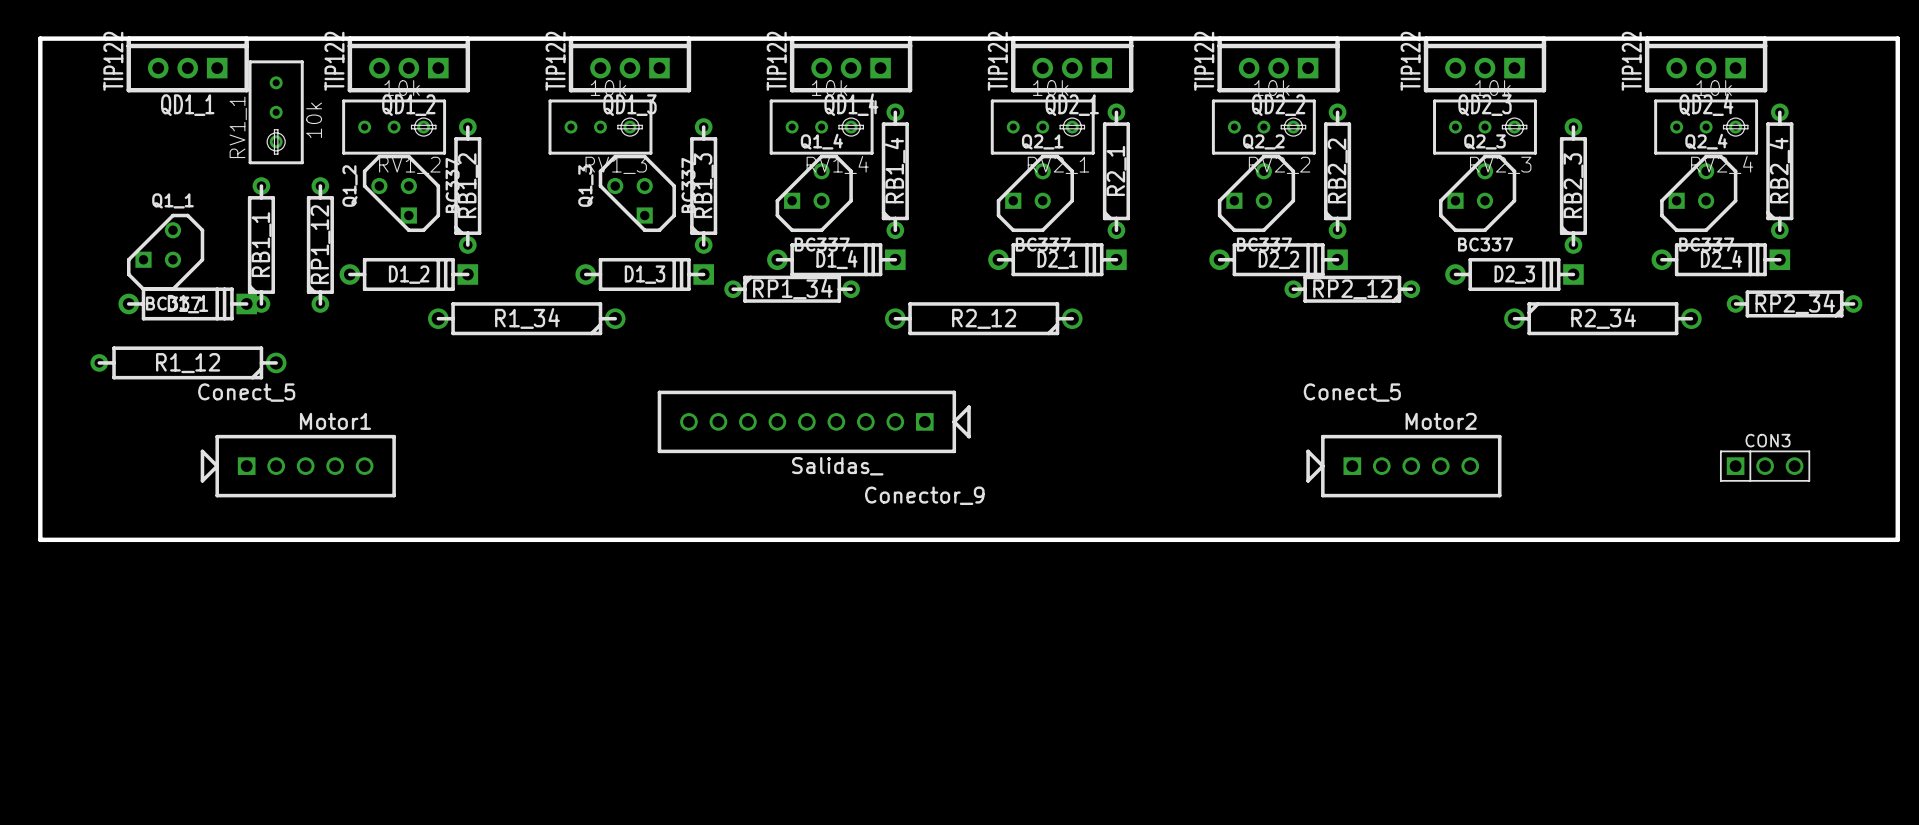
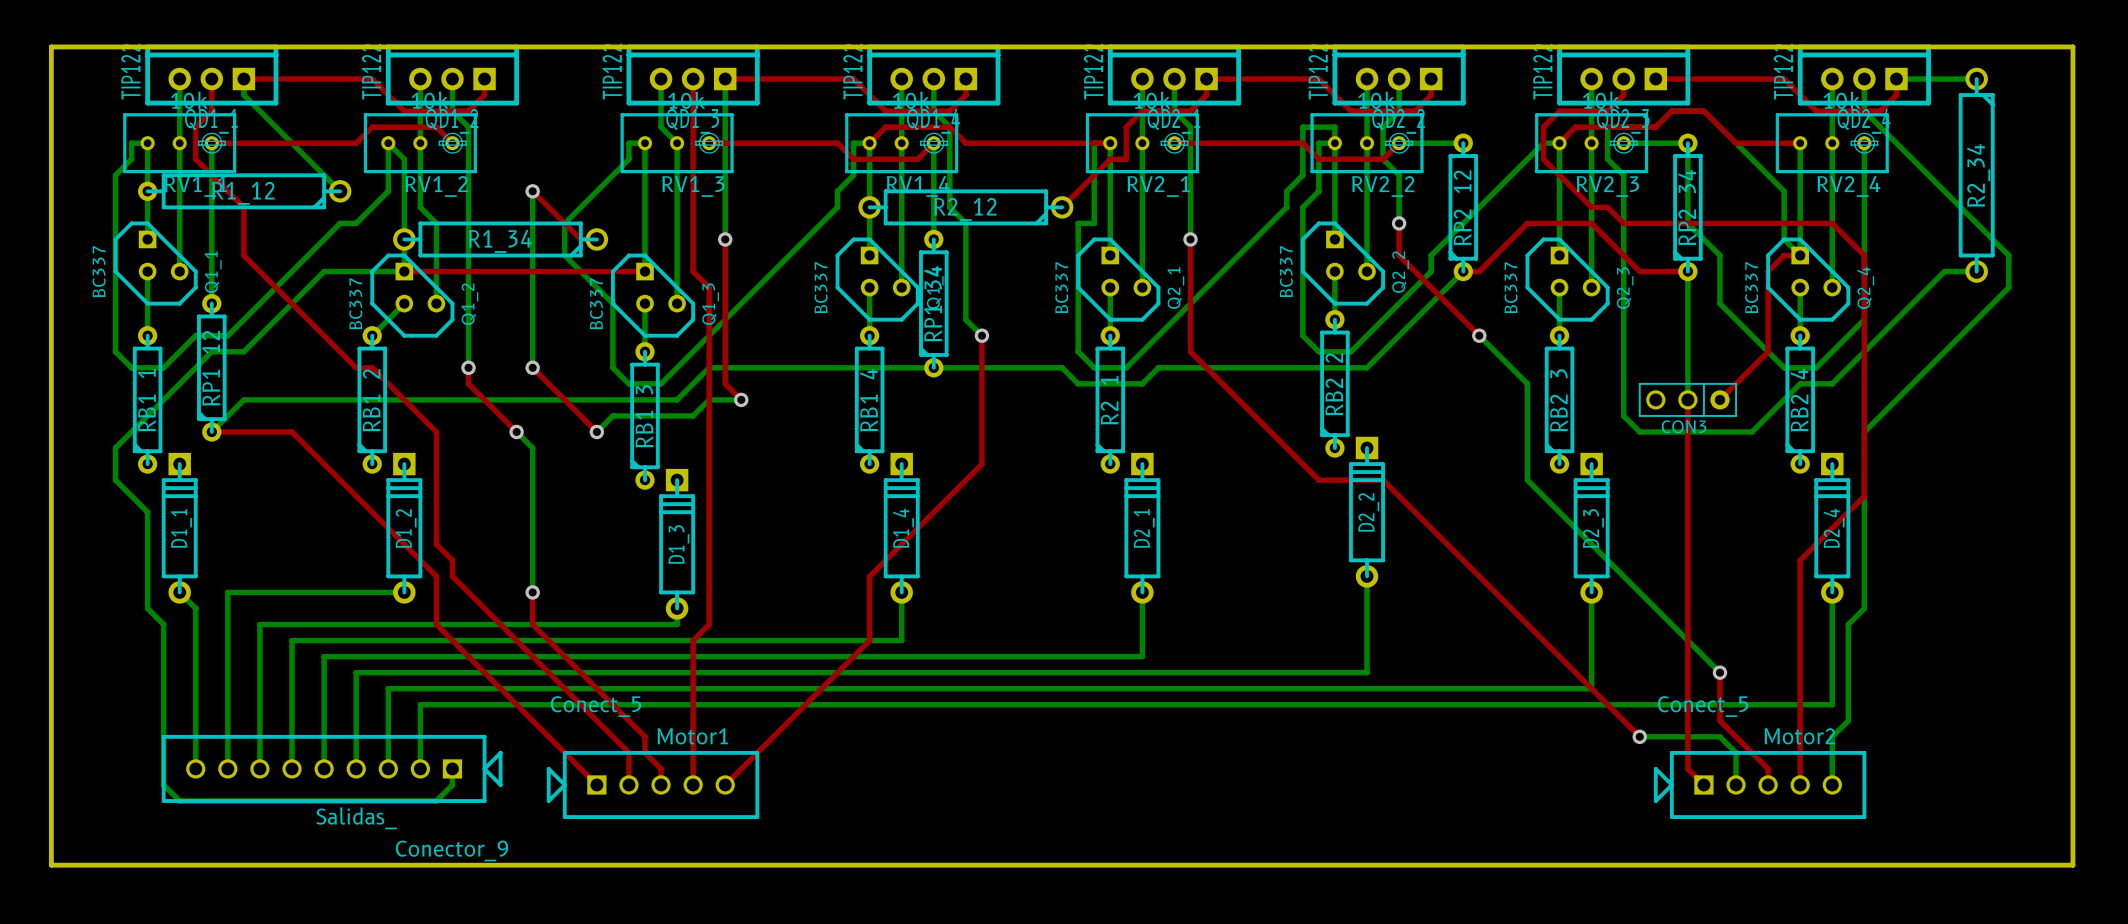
bottom track: none -> (179, 79) (179, 271)
top track: none -> (211, 79) (211, 111) (195, 127) (195, 159) (243, 207) (243, 255) (356, 367) (372, 367) (436, 431) (436, 544) (452, 560) (452, 576) (628, 752) (628, 784)
bottom track: none -> (243, 79) (243, 95) (340, 191)
top track: none -> (243, 79) (372, 79) (404, 111) (468, 111) (484, 95) (484, 79)
bottom track: none -> (420, 79) (420, 207) (436, 223) (436, 303)
bottom track: none -> (452, 79) (452, 111) (468, 127) (468, 367)
bottom track: none -> (661, 79) (661, 127) (677, 143) (677, 303)
top track: none -> (693, 79) (693, 271) (709, 287) (709, 624) (693, 640) (693, 784)
bottom track: none -> (725, 79) (725, 239)
top track: none -> (725, 79) (853, 79) (885, 111) (949, 111) (965, 95) (965, 79)
bottom track: none -> (901, 79) (901, 287)
bottom track: none -> (933, 79) (933, 111) (949, 127) (949, 207) (965, 223) (965, 319) (981, 335)
bottom track: none -> (1142, 79) (1142, 287)
bottom track: none -> (1174, 79) (1174, 111) (1190, 127) (1190, 239)
bottom track: none -> (1367, 79) (1367, 271)
bottom track: none -> (1399, 79) (1399, 111) (1383, 127) (1383, 159) (1399, 175) (1399, 223)
top track: none -> (1431, 79) (1431, 95) (1415, 111) (1350, 111) (1318, 79) (1206, 79) (1206, 95) (1190, 111) (1142, 111) (1126, 127) (1126, 159) (1110, 159) (1062, 207)
bottom track: none -> (1591, 79) (1591, 287)
top track: none -> (1623, 79) (1623, 95) (1607, 111) (1559, 111) (1543, 127) (1543, 159) (1591, 207) (1607, 207) (1623, 223) (1832, 223) (1864, 255) (1864, 496) (1800, 560) (1800, 784)
top track: none -> (1655, 79) (1784, 79) (1816, 111) (1880, 111) (1896, 95) (1896, 79)
bottom track: none -> (1832, 79) (1832, 287)
bottom track: none -> (1864, 79) (1864, 111) (2008, 255) (2008, 287) (1864, 431) (1864, 608) (1848, 624) (1848, 720) (1832, 736) (1832, 784)
bottom track: none -> (1896, 79) (1976, 79)
RV1_1 rotation: 0° (276, 112) -> 90° counterclockwise (179, 143)
RV1_1 position: (276, 112) -> (179, 143)
bottom track: none -> (211, 143) (211, 303)
top track: none -> (211, 143) (356, 143) (372, 127) (436, 127) (452, 143)
RV1_2 position: (394, 127) -> (420, 143)
RV1_3 position: (600, 127) -> (677, 143)
top track: none -> (709, 143) (837, 143) (853, 159) (917, 159) (933, 143)
top track: none -> (869, 143) (885, 127) (949, 127) (965, 143) (1110, 143)
bottom track: none -> (933, 143) (933, 239)
top track: none -> (1174, 143) (1302, 143) (1318, 159) (1383, 159) (1399, 143)
bottom track: none -> (1334, 143) (1318, 143) (1318, 191) (1302, 207) (1302, 335) (1318, 351) (1350, 351) (1431, 271) (1431, 255) (1543, 143) (1559, 143) (1559, 255)
RV2_2 position: (1263, 127) -> (1367, 143)
bottom track: none -> (1399, 143) (1463, 143)
top track: none -> (1559, 143) (1575, 127) (1655, 127) (1671, 111) (1703, 111) (1736, 143) (1800, 143)
bottom track: none -> (1623, 143) (1687, 143) (1687, 223) (1719, 255) (1719, 303) (1784, 367) (1816, 367) (1864, 319) (1864, 143)
RV2_3 position: (1484, 127) -> (1591, 143)
bottom track: none -> (1800, 143) (1800, 255) (1784, 239) (1784, 191) (1703, 111) (1671, 111) (1655, 127) (1607, 127) (1607, 159) (1623, 175) (1623, 415) (1639, 431) (1752, 431) (1800, 383) (1832, 383) (1944, 271) (1976, 271)
RV2_4 position: (1706, 127) -> (1832, 143)
bottom track: none -> (532, 191) (532, 367)
top track: none -> (532, 191) (580, 239) (596, 239)
via: none -> (532, 191)
RB1_4 position: (895, 171) -> (869, 399)
R2_1 position: (1116, 171) -> (1110, 399)
RB2_2 position: (1337, 171) -> (1334, 383)
RB2_4 position: (1779, 171) -> (1800, 399)
RB1_2 position: (467, 186) -> (372, 399)
RB1_3 position: (703, 186) -> (645, 415)
RB2_3 position: (1573, 186) -> (1559, 399)
Q1_2 rotation: 0° (401, 193) -> 180° (412, 295)
Q1_2 position: (401, 193) -> (412, 295)
Q1_3 rotation: 0° (637, 193) -> 180° (653, 295)
Q1_3 position: (637, 193) -> (653, 295)
Q1_4 rotation: 0° (814, 193) -> 90° clockwise (877, 279)
Q1_4 position: (814, 193) -> (877, 279)
Q2_1 rotation: 0° (1035, 193) -> 90° clockwise (1118, 279)
Q2_1 position: (1035, 193) -> (1118, 279)
Q2_2 rotation: 0° (1256, 193) -> 90° clockwise (1342, 263)
Q2_2 position: (1256, 193) -> (1342, 263)
Q2_3 rotation: 0° (1477, 193) -> 90° clockwise (1567, 279)
Q2_3 position: (1477, 193) -> (1567, 279)
Q2_4 rotation: 0° (1698, 193) -> 90° clockwise (1808, 279)
Q2_4 position: (1698, 193) -> (1808, 279)
top track: none -> (1399, 223) (1399, 255) (1479, 335)
via: none -> (1399, 223)
bottom track: none -> (147, 239) (147, 143) (131, 143) (131, 159) (115, 175) (115, 351) (131, 367) (163, 367) (195, 335) (227, 335) (340, 223) (356, 223) (388, 191) (388, 143) (404, 159) (404, 271) (324, 271) (243, 351) (211, 351) (115, 448) (115, 480) (147, 512) (147, 608) (163, 624) (163, 784) (179, 801) (436, 801) (452, 784) (452, 768)
top track: none -> (725, 239) (725, 383) (741, 399)
via: none -> (725, 239)
top track: none -> (1190, 239) (1190, 351) (1318, 480) (1383, 480) (1639, 736)
via: none -> (1190, 239)
bottom track: none -> (1334, 239) (1334, 127) (1302, 127) (1302, 175) (1286, 191) (1286, 207) (1126, 367) (1094, 367) (1078, 351) (1078, 223) (1094, 223) (1094, 143) (1110, 143) (1110, 255)
bottom track: none -> (869, 255) (869, 143) (853, 143) (853, 175) (837, 191) (837, 207) (661, 383) (628, 383) (612, 367) (612, 303) (564, 255) (564, 223) (628, 159) (628, 143) (645, 143) (645, 271)
top track: none -> (1800, 255) (1784, 255) (1768, 271) (1768, 351) (1719, 399)
bottom track: none -> (147, 271) (147, 335)
RB1_1 position: (261, 245) -> (147, 399)
RP1_12 position: (320, 245) -> (211, 367)
top track: none -> (404, 271) (645, 271)
bottom track: none -> (1334, 271) (1334, 319)
bottom track: none -> (1463, 271) (1367, 367) (1158, 367) (1142, 383) (1078, 383) (1062, 367) (709, 367) (677, 399) (243, 399) (211, 431)
top track: none -> (1463, 271) (1479, 271) (1527, 223) (1591, 223) (1639, 271) (1687, 271)
bottom track: none -> (1687, 271) (1687, 399)
Q1_1 rotation: 0° (165, 252) -> 90° clockwise (155, 263)
bottom track: none -> (869, 287) (869, 335)
D1_4 rotation: 0° (836, 259) -> 90° counterclockwise (901, 528)
D1_4 position: (836, 259) -> (901, 528)
bottom track: none -> (1110, 287) (1110, 335)
D2_1 rotation: 0° (1057, 259) -> 90° counterclockwise (1142, 528)
D2_1 position: (1057, 259) -> (1142, 528)
D2_2 rotation: 0° (1278, 259) -> 90° counterclockwise (1367, 512)
D2_2 position: (1278, 259) -> (1367, 512)
bottom track: none -> (1559, 287) (1559, 335)
bottom track: none -> (1800, 287) (1800, 335)
D2_4 rotation: 0° (1720, 259) -> 90° counterclockwise (1832, 528)
D2_4 position: (1720, 259) -> (1832, 528)
bottom track: none -> (404, 303) (372, 335)
D1_2 rotation: 0° (408, 274) -> 90° counterclockwise (404, 528)
D1_2 position: (408, 274) -> (404, 528)
bottom track: none -> (645, 303) (645, 351)
D1_3 rotation: 0° (644, 274) -> 90° counterclockwise (677, 544)
D1_3 position: (644, 274) -> (677, 544)
D2_3 rotation: 0° (1514, 274) -> 90° counterclockwise (1591, 528)
D2_3 position: (1514, 274) -> (1591, 528)
RP1_34 rotation: 0° (792, 289) -> 90° counterclockwise (933, 303)
RP2_12 rotation: 0° (1352, 289) -> 90° clockwise (1463, 207)
RP2_12 position: (1352, 289) -> (1463, 207)
D1_1 rotation: 0° (187, 303) -> 90° counterclockwise (179, 528)
D1_1 position: (187, 303) -> (179, 528)
top track: none -> (981, 335) (981, 464) (869, 576) (869, 640) (725, 784)
via: none -> (981, 335)
bottom track: none -> (1479, 335) (1527, 383) (1527, 480) (1719, 672)
via: none -> (1479, 335)
RP2_34 rotation: 0° (1794, 303) -> 90° clockwise (1687, 207)
RP2_34 position: (1794, 303) -> (1687, 207)
R1_34 position: (526, 318) -> (500, 239)
R2_12 position: (983, 318) -> (965, 207)
R2_34 rotation: 0° (1602, 318) -> 90° clockwise (1976, 175)
R2_34 position: (1602, 318) -> (1976, 175)
top track: none -> (468, 367) (468, 383) (516, 431)
via: none -> (468, 367)
top track: none -> (532, 367) (596, 431)
via: none -> (532, 367)
R1_12 position: (188, 362) -> (244, 191)
bottom track: none -> (741, 399) (709, 399) (693, 415) (612, 415) (596, 431)
via: none -> (741, 399)
top track: none -> (1687, 399) (1687, 768) (1703, 784)
top track: none -> (211, 431) (292, 431) (436, 576) (436, 624) (596, 784)
bottom track: none -> (516, 431) (532, 448) (532, 592)
via: none -> (516, 431)
via: none -> (596, 431)
Salidas_: Conector_9 (814, 421) -> none
CON3 name position: CON3 (1768, 440) -> CON3 (1684, 426)
CON3 footprint: [1719, 450, 1811, 482] -> [1638, 382, 1737, 417]
Motor1 position: (298, 466) -> (653, 784)
Motor2 position: (1403, 466) -> (1760, 784)
bottom track: none -> (1367, 576) (1367, 672) (356, 672) (356, 768)
board edge: (40, 539) (1897, 539) -> (51, 592) (51, 865) (2072, 865) (2072, 592)
bottom track: none -> (179, 592) (195, 608) (195, 768)
bottom track: none -> (404, 592) (227, 592) (227, 768)
top track: none -> (532, 592) (532, 624) (645, 736) (645, 752) (661, 768) (661, 784)
via: none -> (532, 592)
bottom track: none -> (901, 592) (901, 640) (292, 640) (292, 768)
bottom track: none -> (1142, 592) (1142, 656) (324, 656) (324, 768)
bottom track: none -> (1591, 592) (1591, 688) (388, 688) (388, 768)
bottom track: none -> (1832, 592) (1832, 704) (420, 704) (420, 768)
bottom track: none -> (677, 608) (677, 624) (259, 624) (259, 768)
top track: none -> (1719, 672) (1719, 720) (1768, 768) (1768, 784)
via: none -> (1719, 672)
bottom track: none -> (1639, 736) (1719, 736) (1736, 752) (1736, 784)
via: none -> (1639, 736)
Salidas_: none -> Conector_9 (332, 768)

